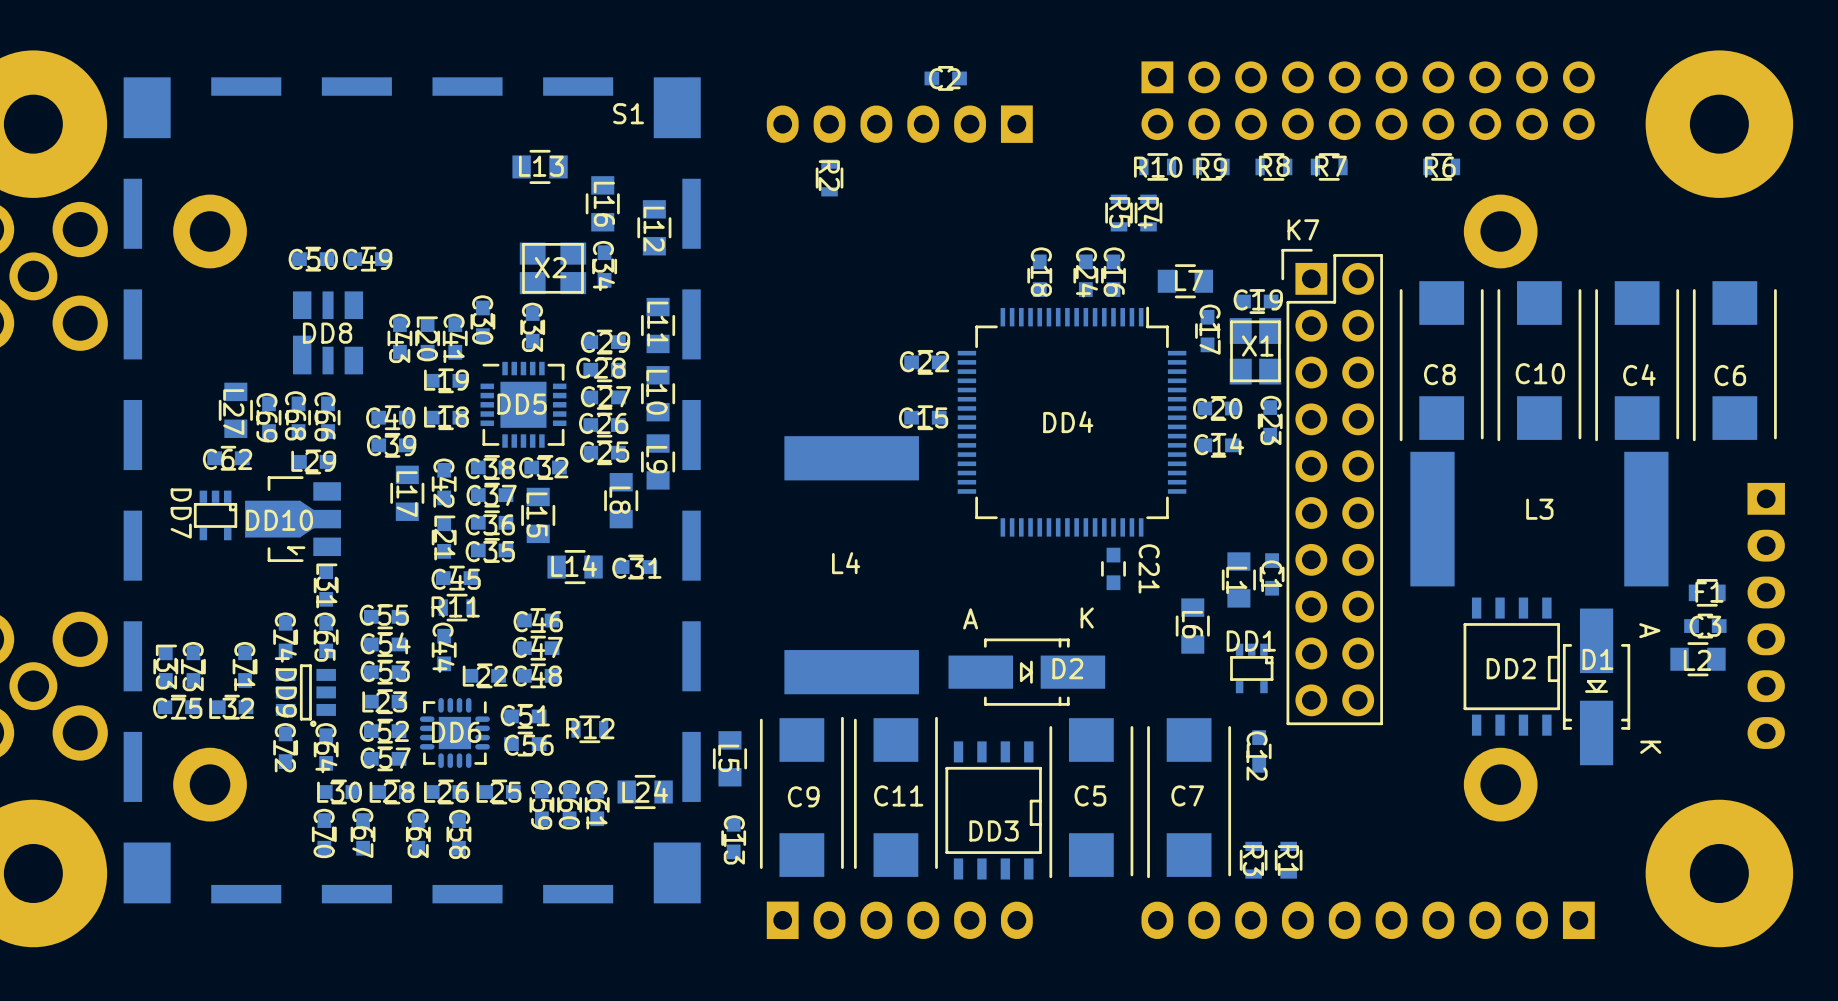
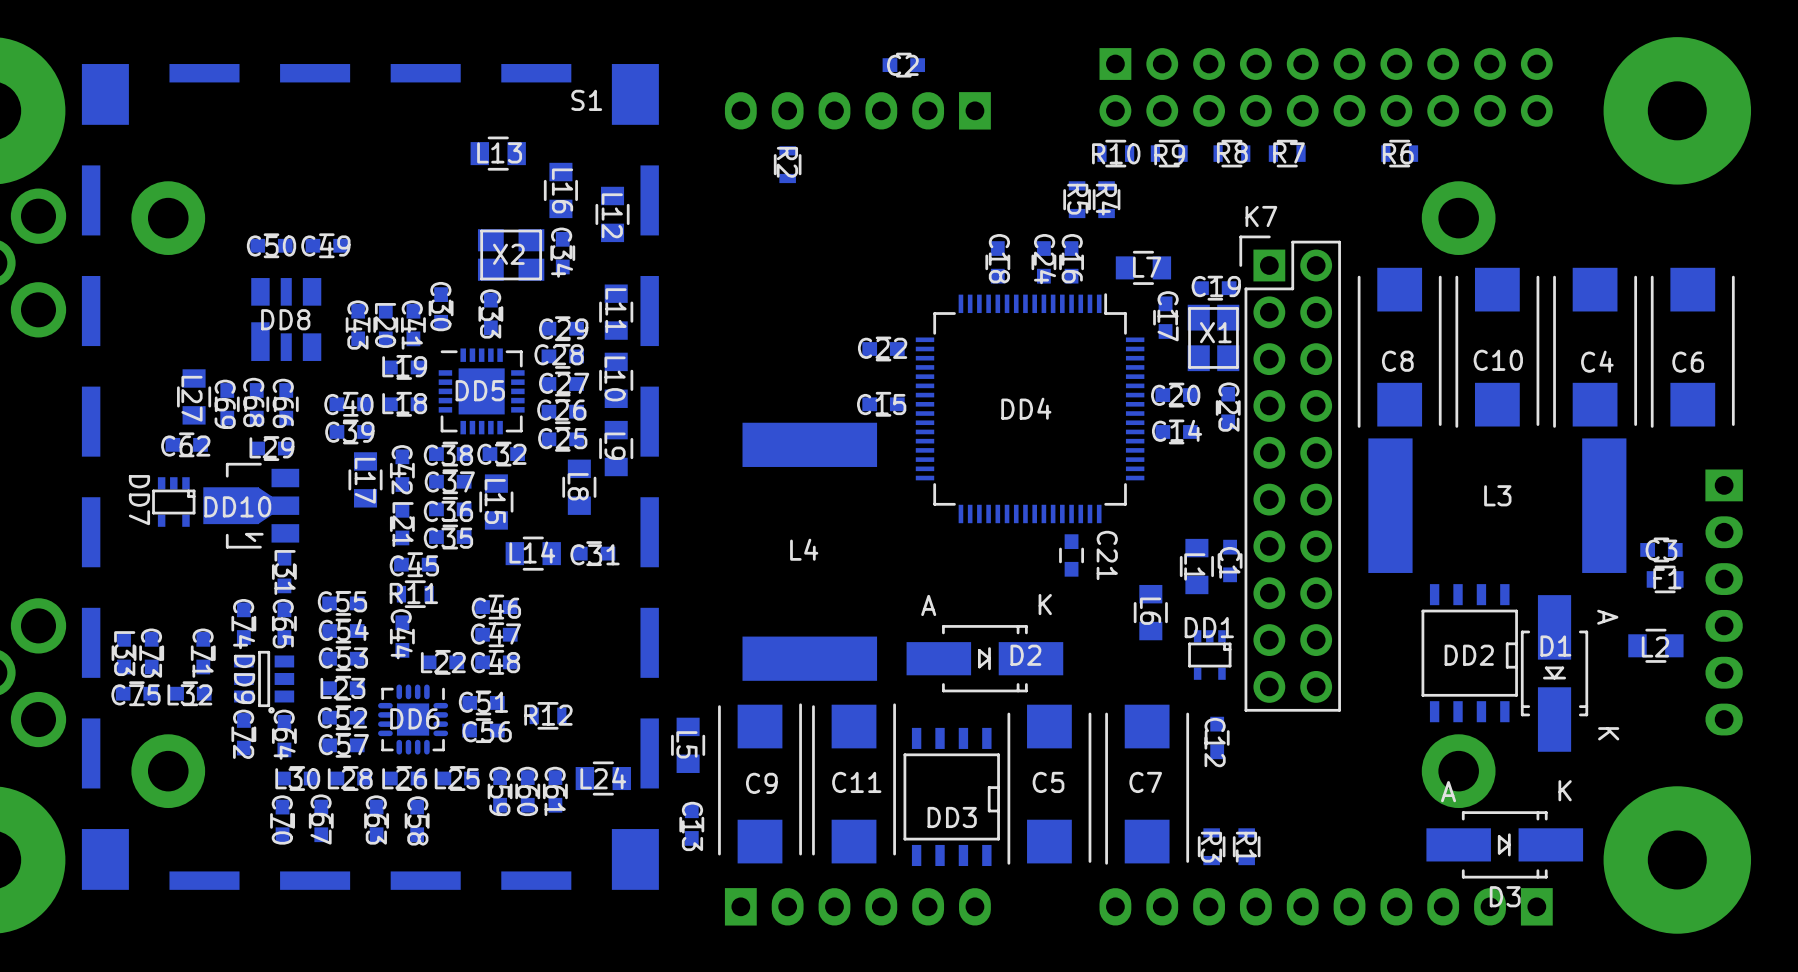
C3 position: (1705, 626) -> (1661, 549)
D3: none -> (1504, 844)

